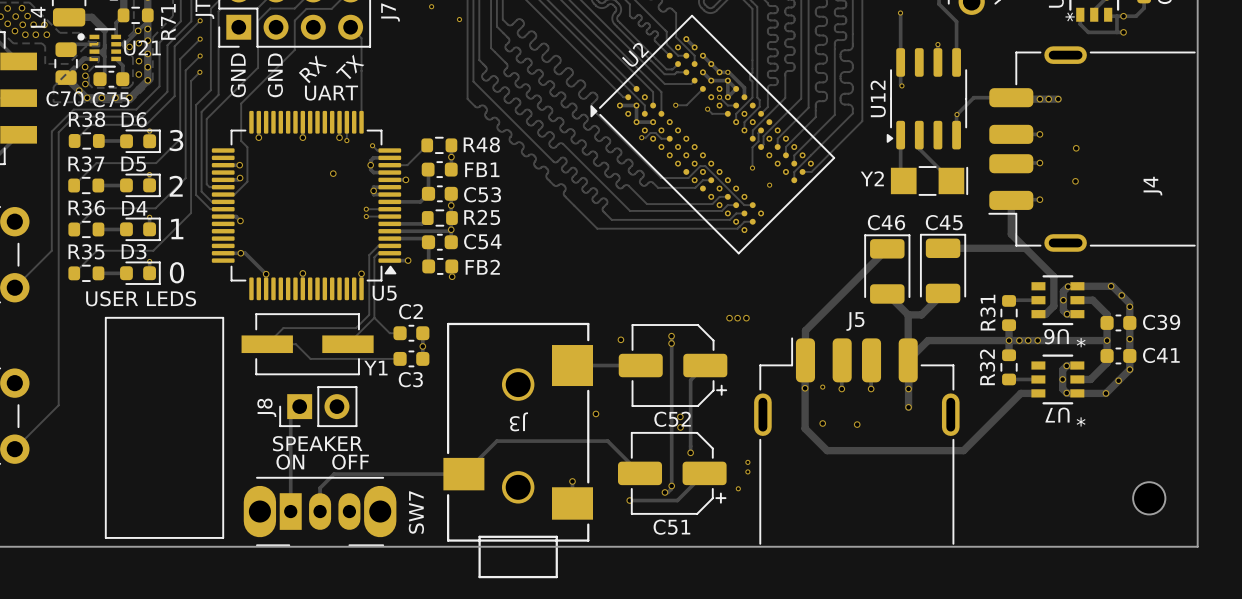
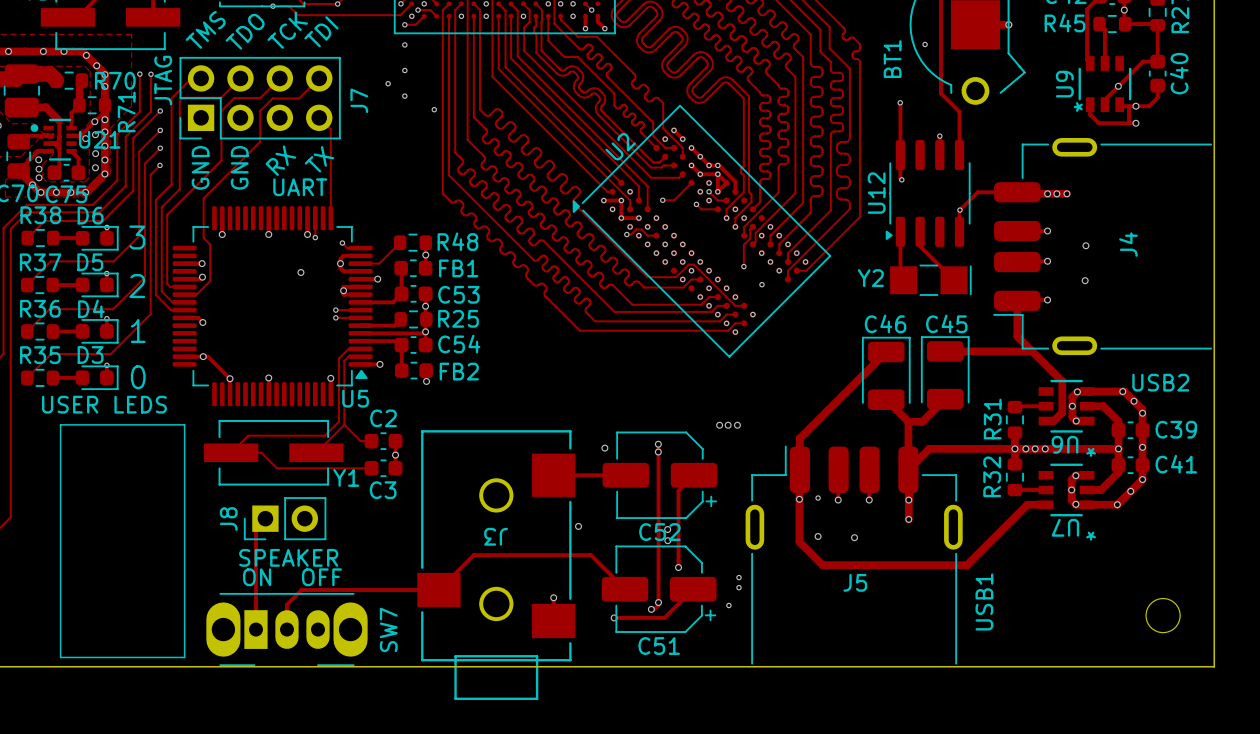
J4 name position: J4 (1152, 186) -> J4 (1128, 244)
text: none -> USB2 (1160, 382)
J5 name position: J5 (855, 321) -> J5 (855, 582)
text: none -> USB1 (984, 602)

